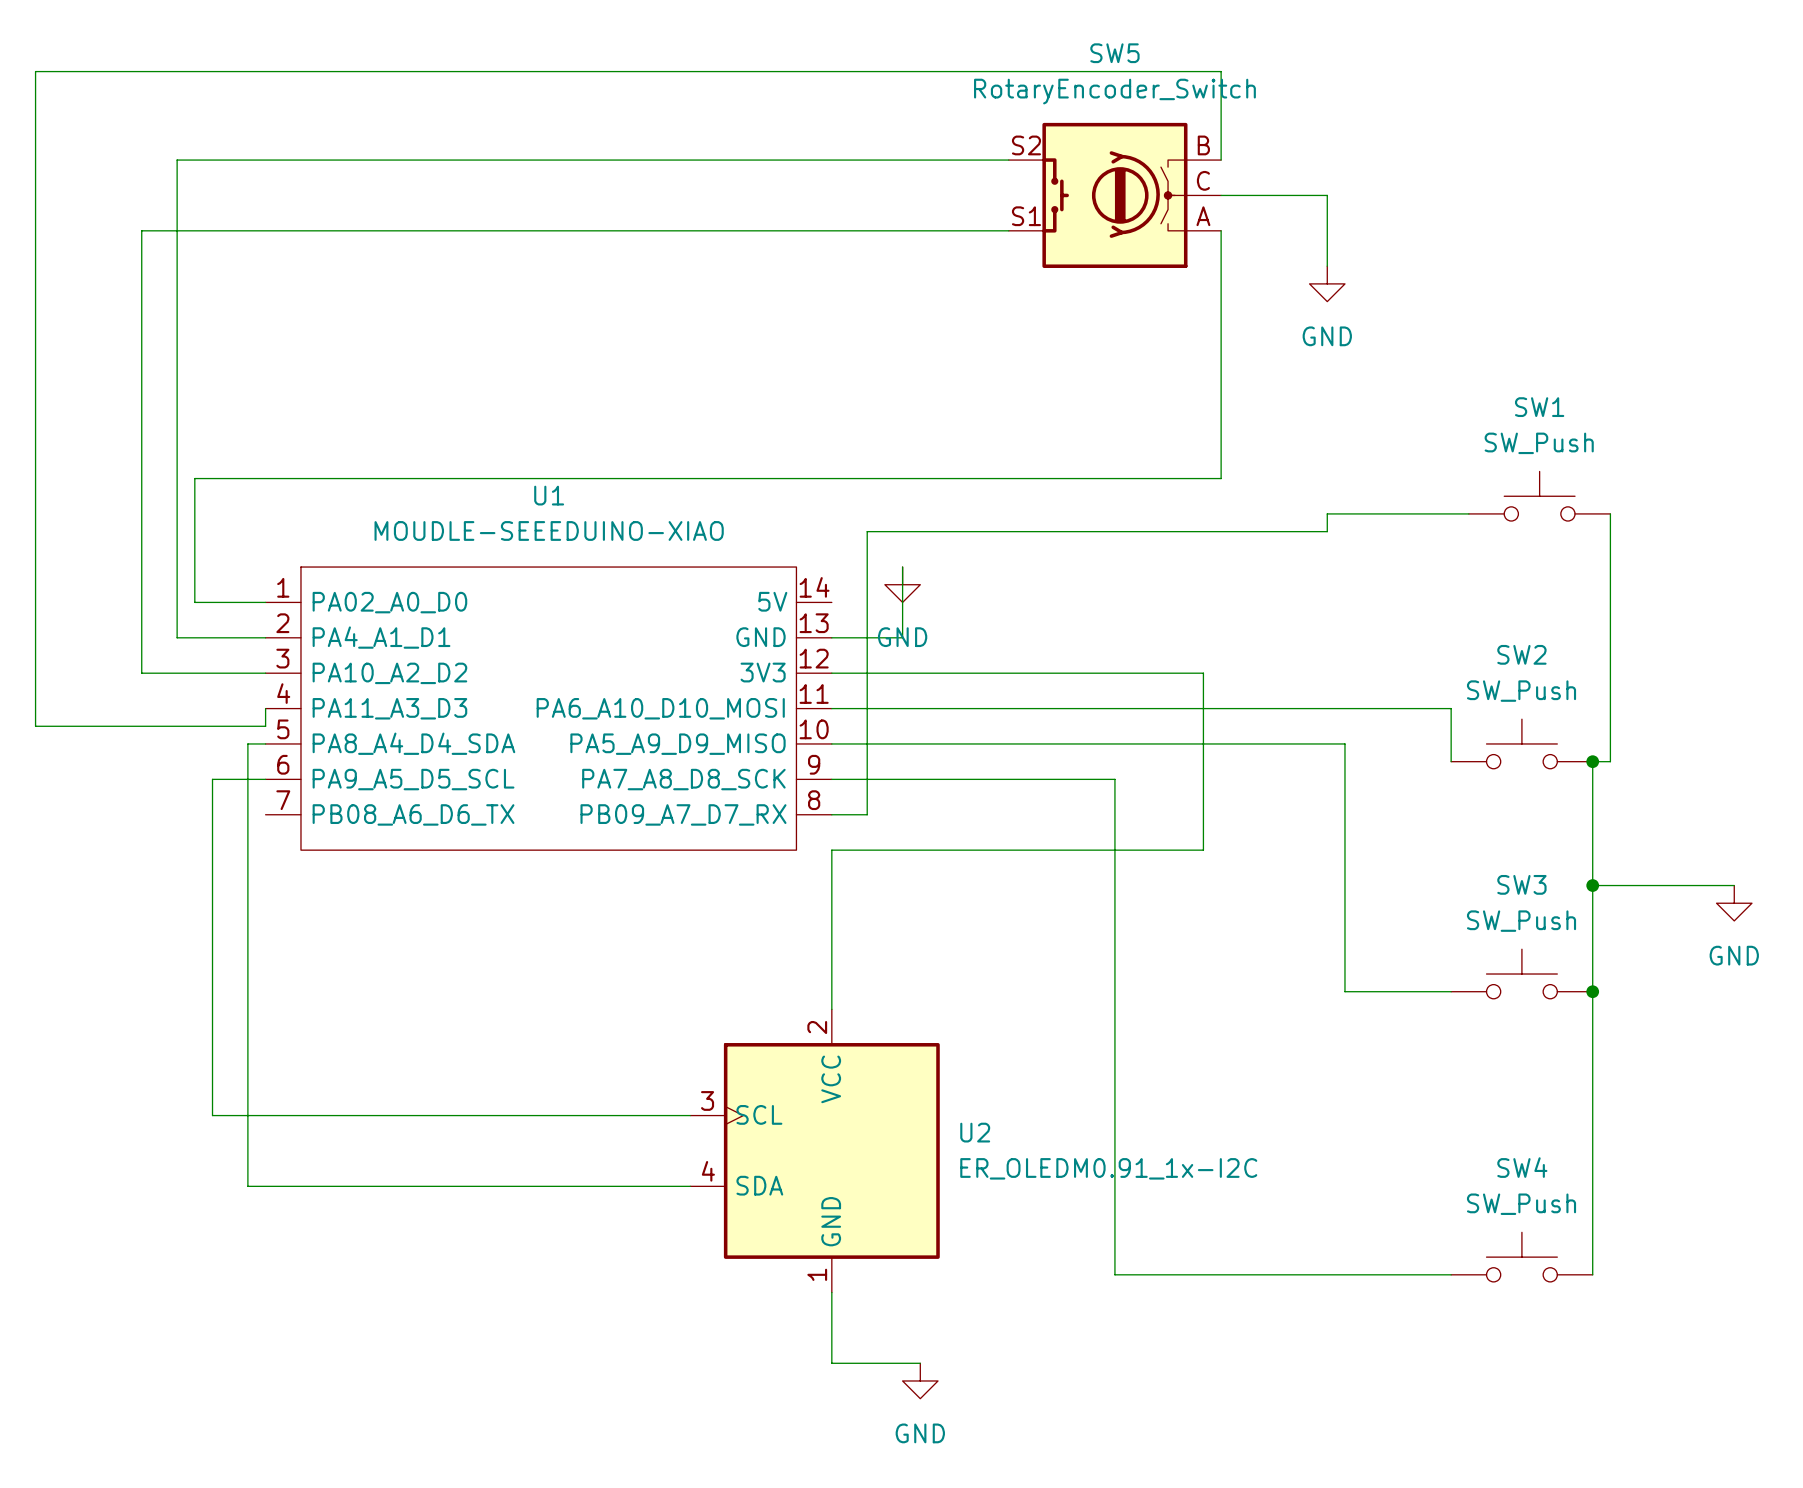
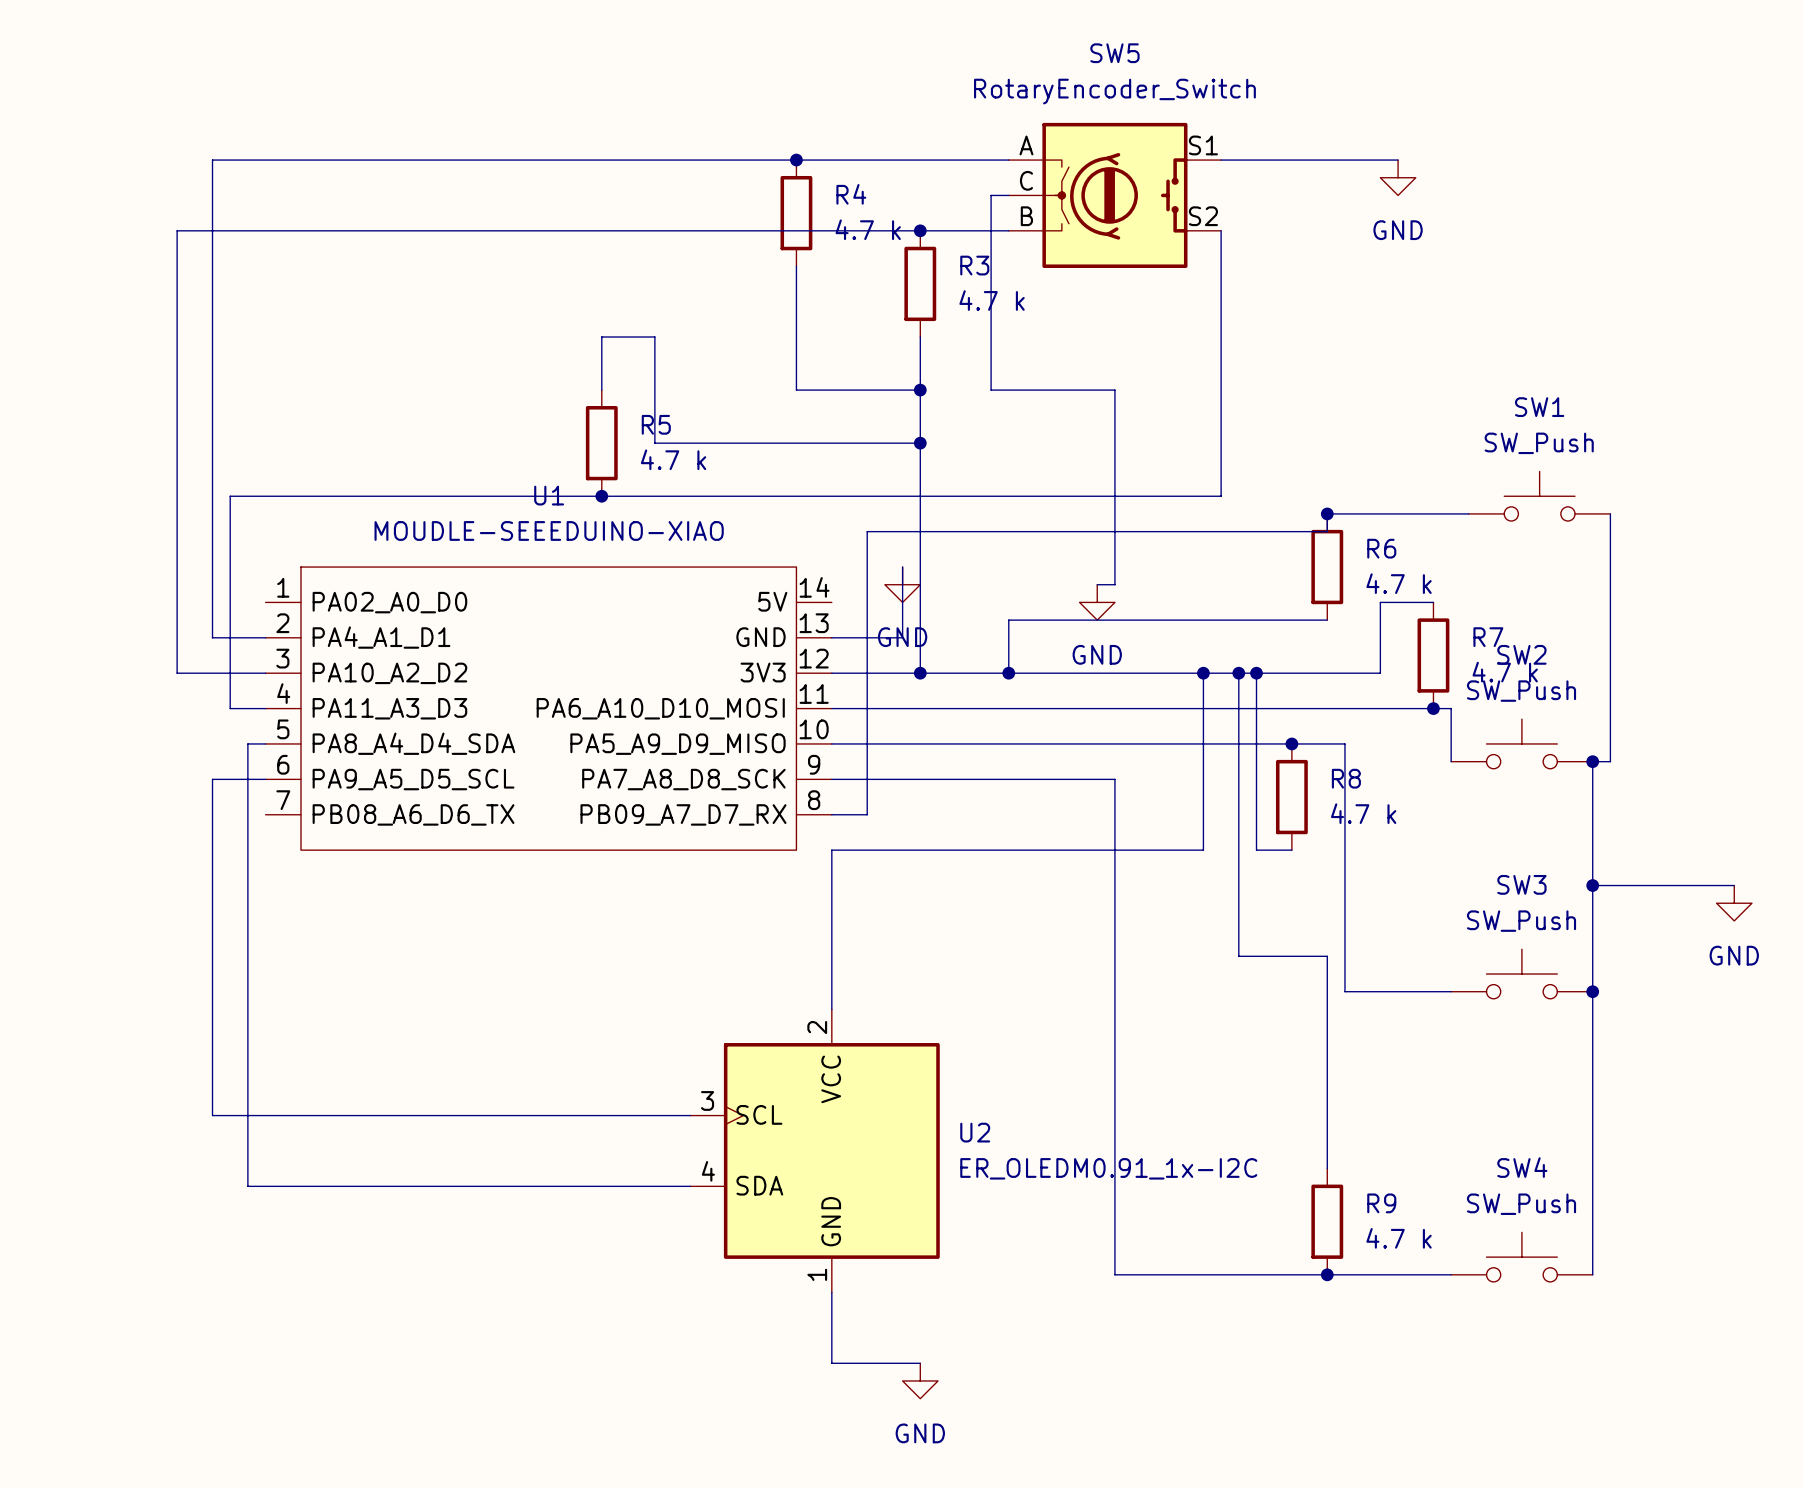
wire: (212, 160) (177, 160) (177, 230) (141, 230) (141, 673) (177, 673) -> (212, 160) (212, 637)
junction: none -> (796, 160)
wire: (1221, 160) (1221, 71) (35, 71) (35, 726) (265, 726) (265, 708) -> (1221, 160) (1398, 160)
wire: none -> (1008, 195) (991, 195) (991, 390) (1114, 390) (1114, 584) (1097, 584)
SW5 rotation: 0° (1114, 195) -> 180° (1114, 195)
wire: (1221, 195) (1327, 195) (1327, 266) -> none
R4: none -> 4.7 k (796, 213)
junction: none -> (920, 230)
wire: none -> (796, 266) (796, 390) (920, 390)
R3: none -> 4.7 k (920, 283)
power symbol position: GND (1327, 283) -> GND (1398, 177)
wire: none -> (920, 336) (920, 673)
wire: none -> (601, 390) (601, 336) (654, 336) (654, 443) (920, 443)
junction: none -> (920, 390)
R5: none -> 4.7 k (601, 443)
junction: none -> (920, 443)
wire: (1221, 478) (194, 478) (194, 602) (265, 602) -> (1221, 478) (1221, 496) (230, 496) (230, 708) (265, 708)
junction: none -> (601, 496)
junction: none -> (1327, 513)
R6: none -> 4.7 k (1327, 567)
power symbol: none -> GND (1097, 602)
wire: none -> (1433, 602) (1380, 602) (1380, 673) (1203, 673)
wire: none -> (1327, 620) (1008, 620) (1008, 673)
wire: (177, 637) (212, 637) -> (177, 637) (177, 673)
R7: none -> 4.7 k (1433, 655)
junction: none -> (920, 673)
junction: none -> (1008, 673)
junction: none -> (1203, 673)
wire: none -> (1238, 673) (1238, 956) (1327, 956) (1327, 1168)
junction: none -> (1238, 673)
wire: none -> (1256, 673) (1256, 850) (1291, 850)
junction: none -> (1256, 673)
junction: none -> (1433, 708)
junction: none -> (1291, 743)
R8: none -> 4.7 k (1291, 797)
R9: none -> 4.7 k (1327, 1221)
junction: none -> (1327, 1274)

